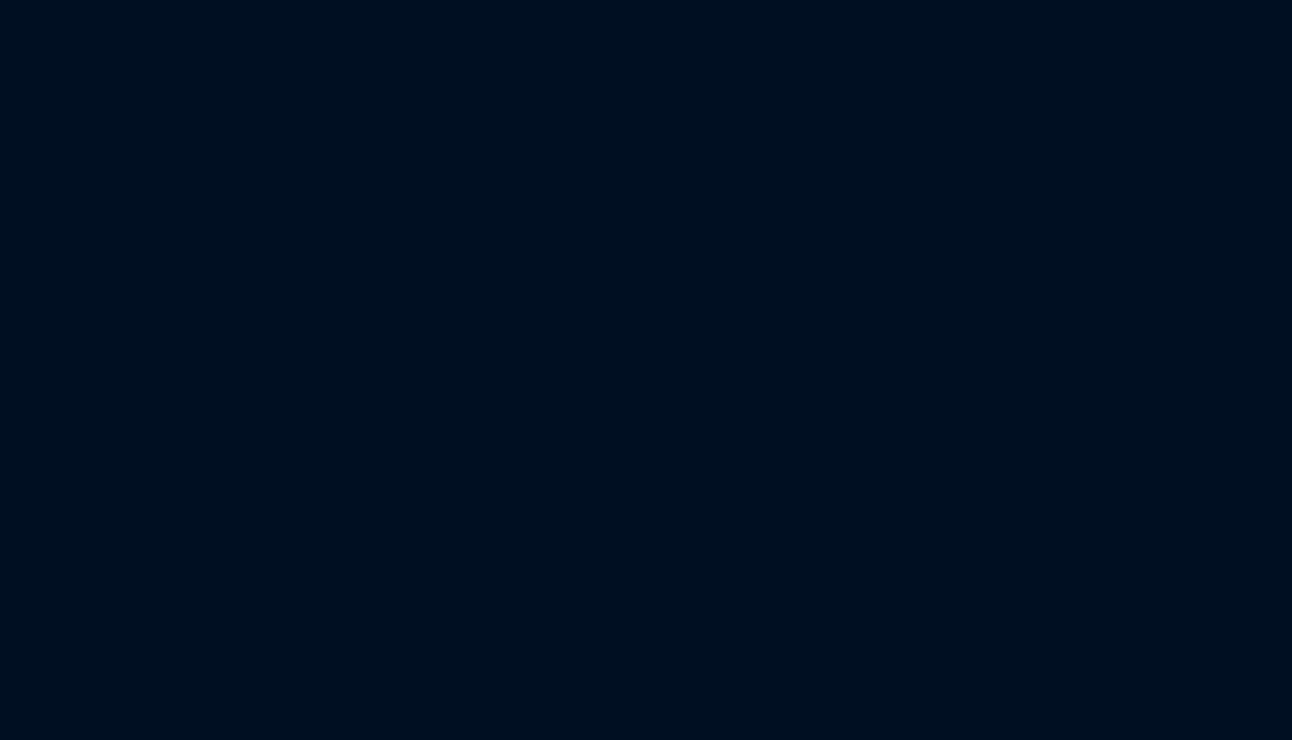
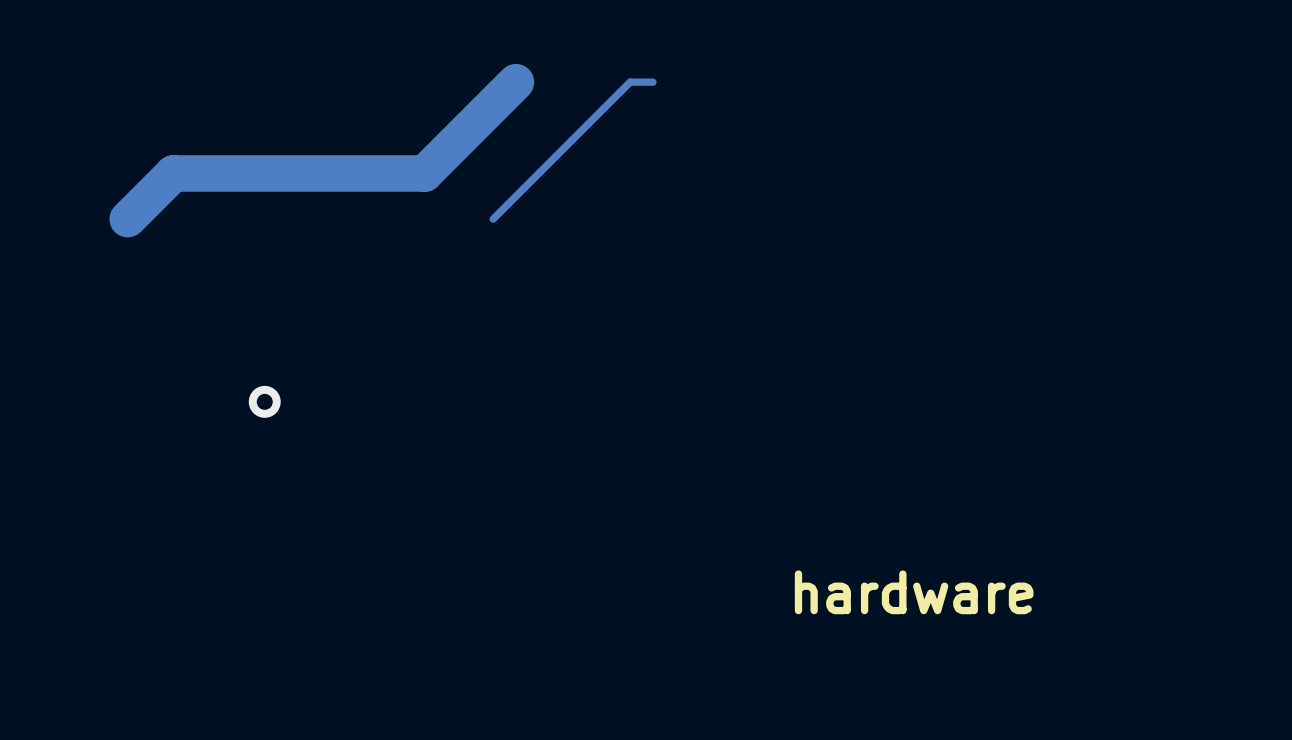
bottom track: none -> (515, 82) (424, 173) (173, 173) (127, 219)
bottom track: none -> (652, 82) (630, 82) (493, 219)
via: none -> (264, 401)
text: none -> hardware (914, 592)

